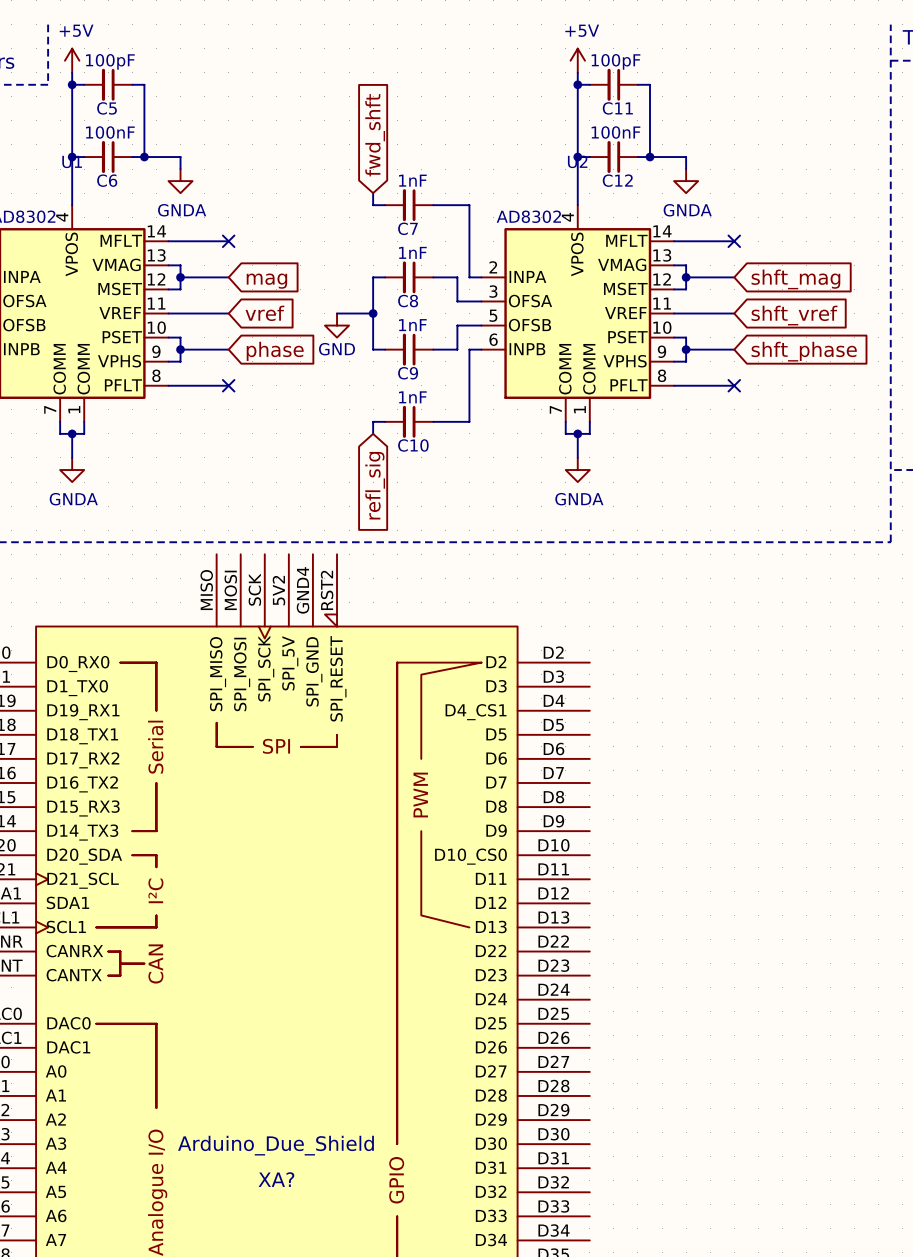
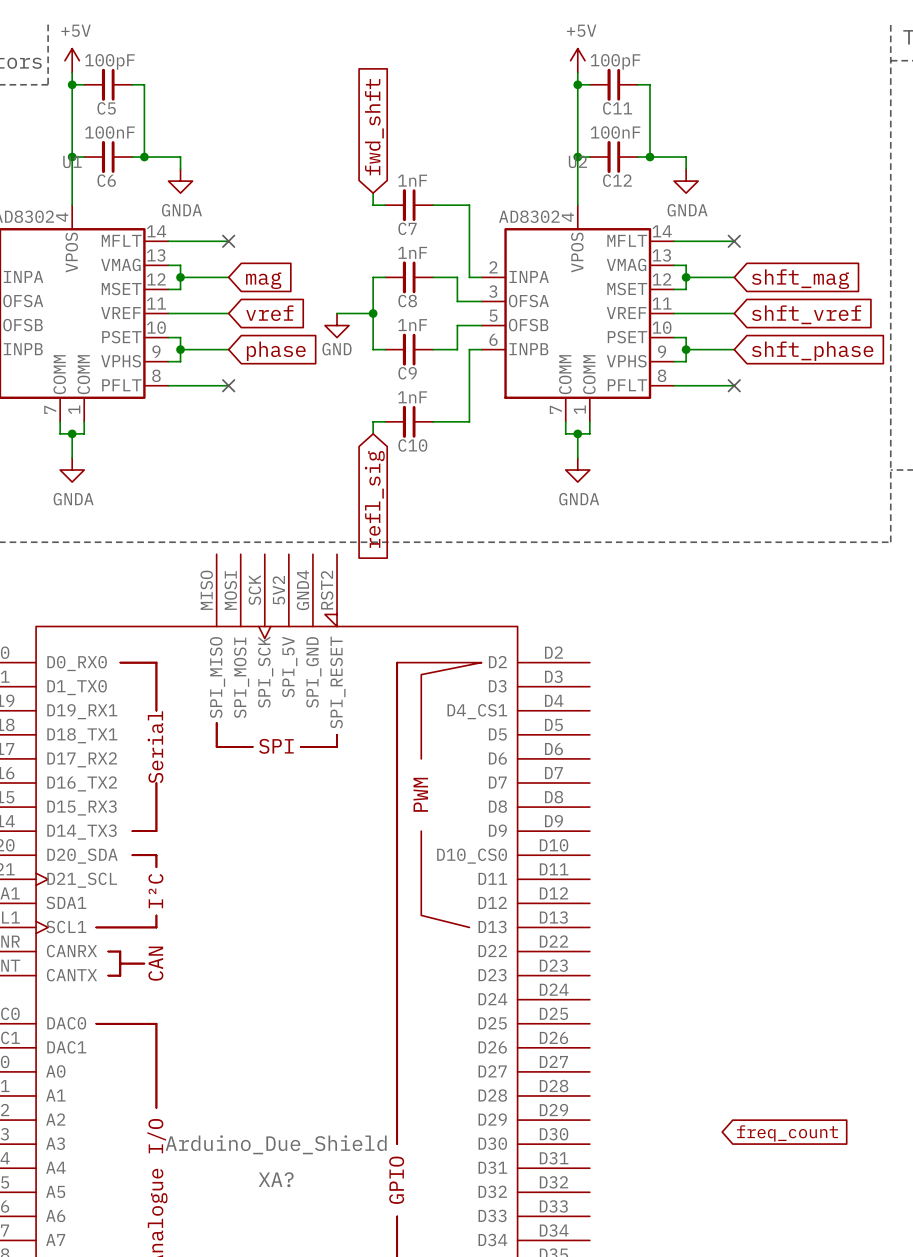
global label: none -> freq_count (787, 1133)

